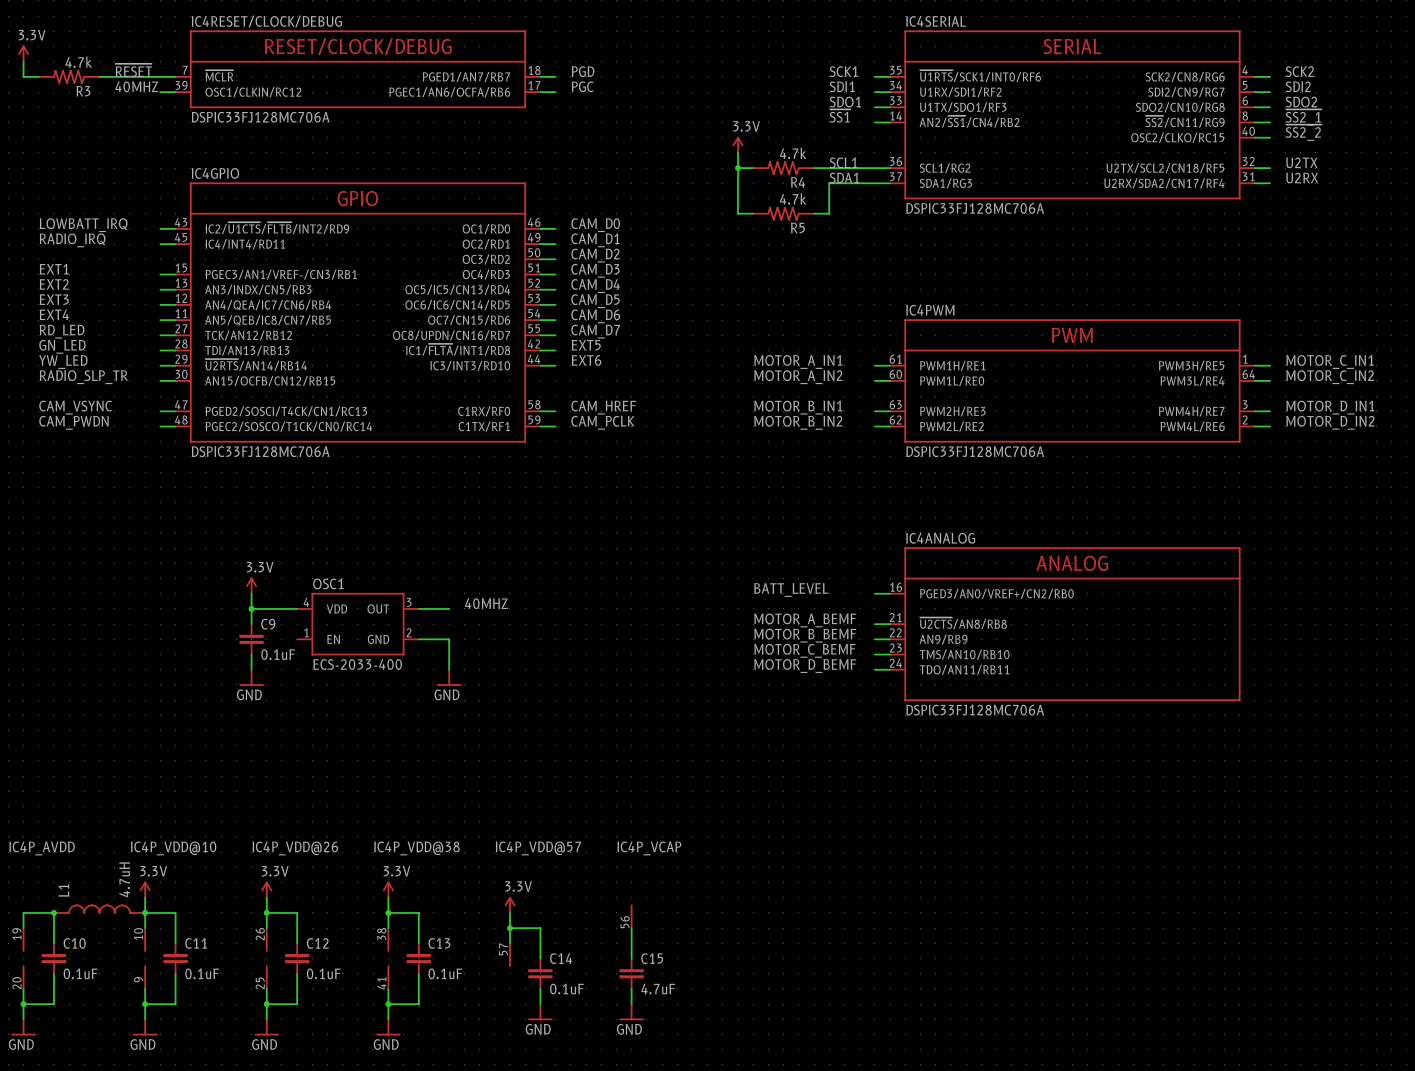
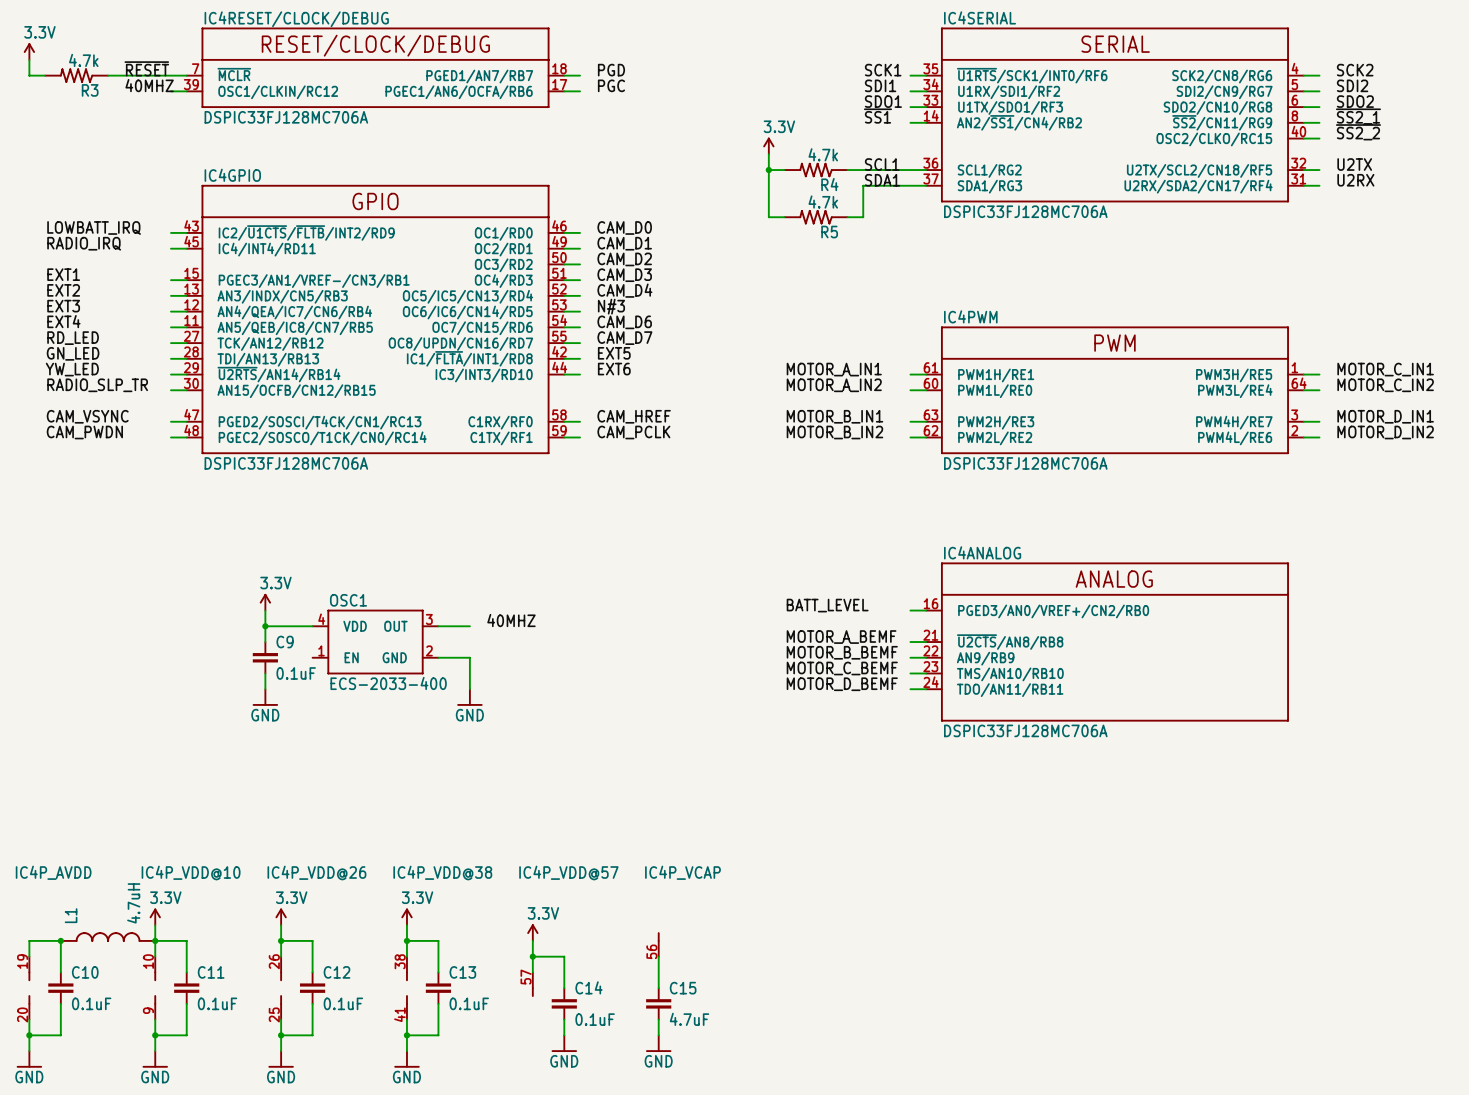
label: CAM_D5 (595, 301) -> N#3 (611, 306)

